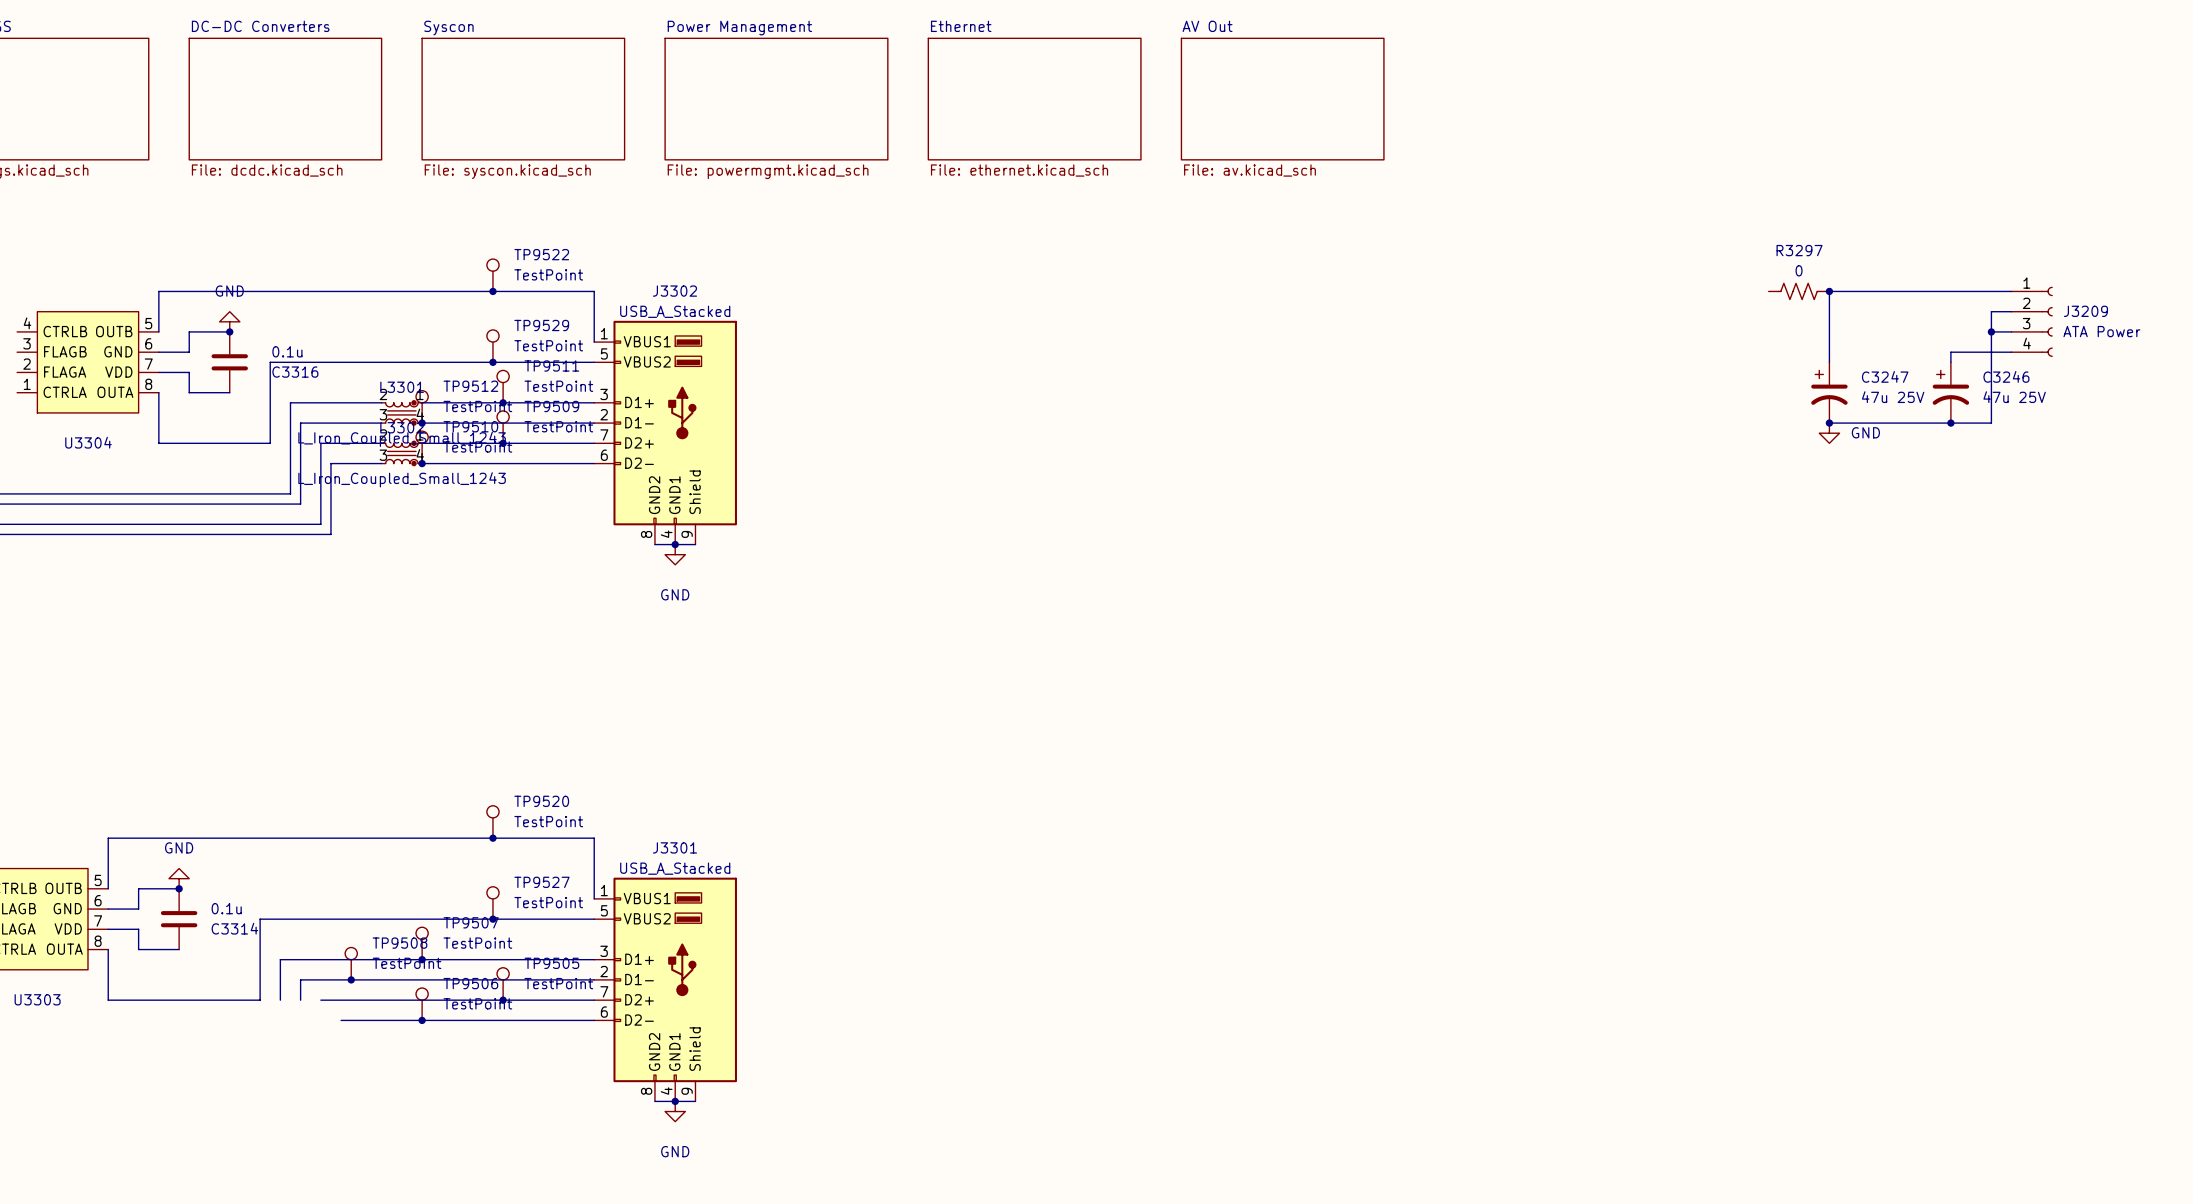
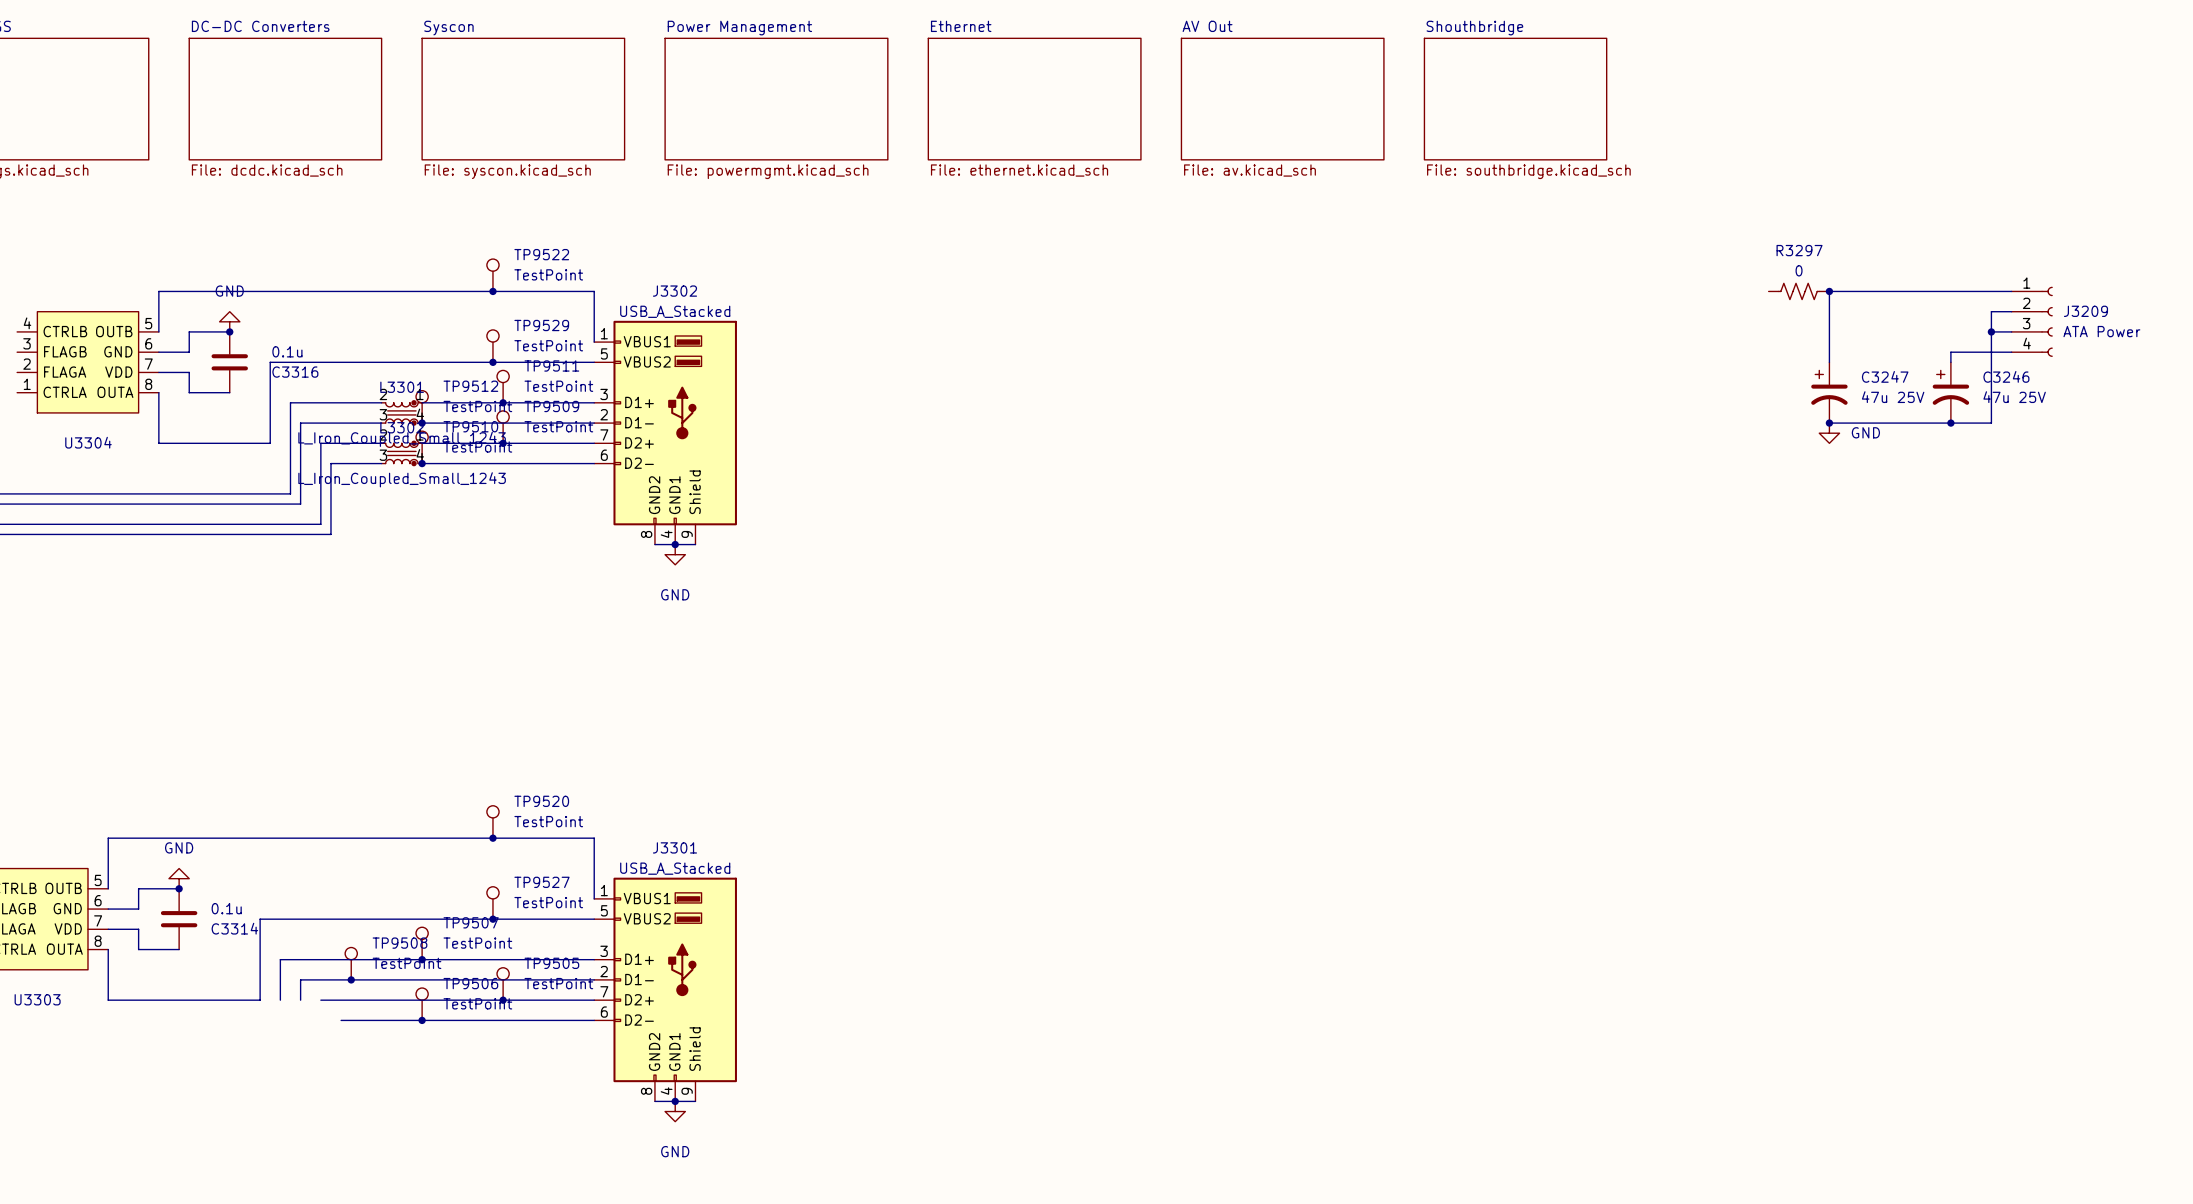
sheet Shouthbridge: none -> File: southbridge.kicad_sch (1515, 99)

